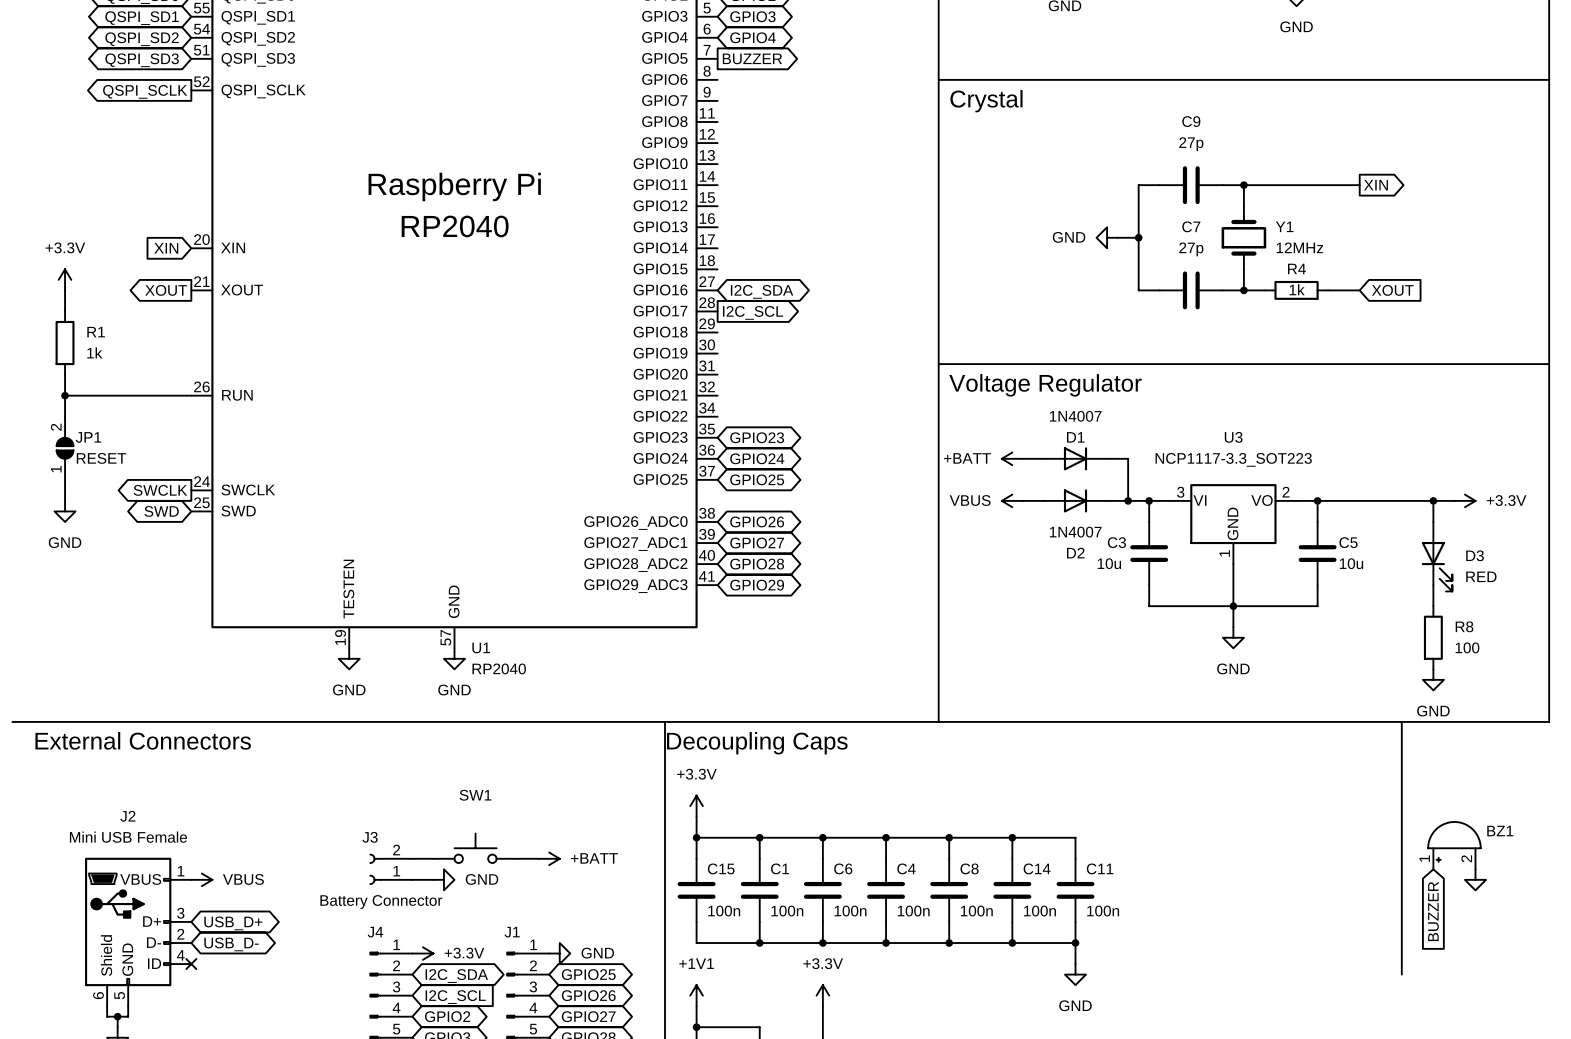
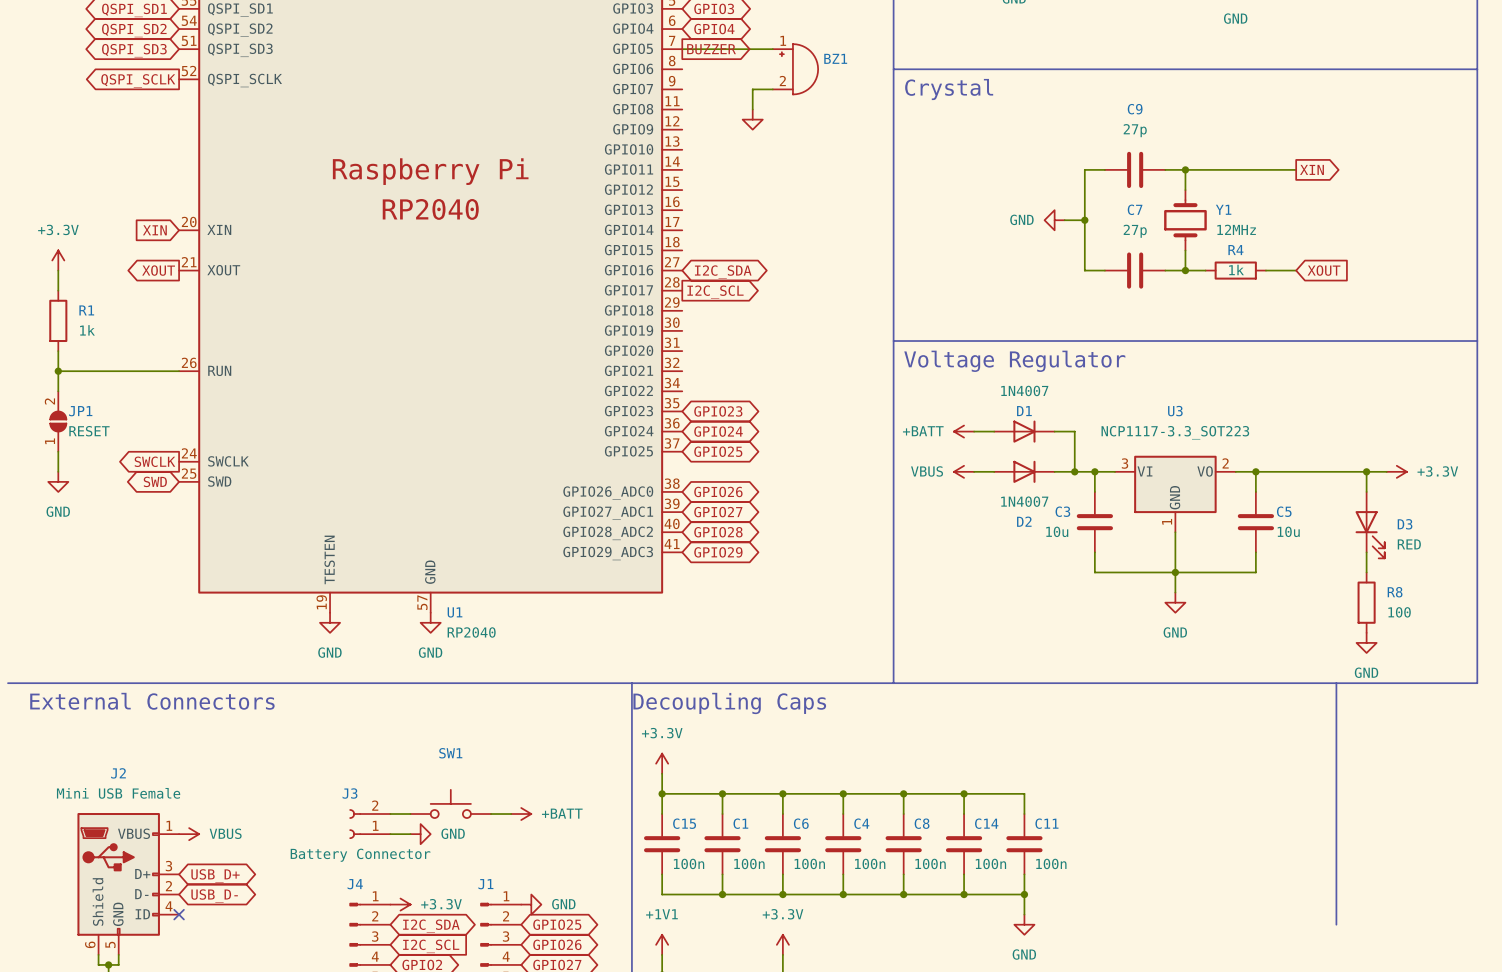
wire: none -> (682, 49) (772, 49)
wire: none -> (772, 89) (752, 89) (752, 109)
power symbol: none -> (752, 119)
BZ1 rotation: 0° (1454, 841) -> 90° clockwise (799, 69)
BZ1 position: (1454, 845) -> (795, 69)
power symbol: (1475, 879) -> none
global label: BUZZER (1433, 911) -> none

